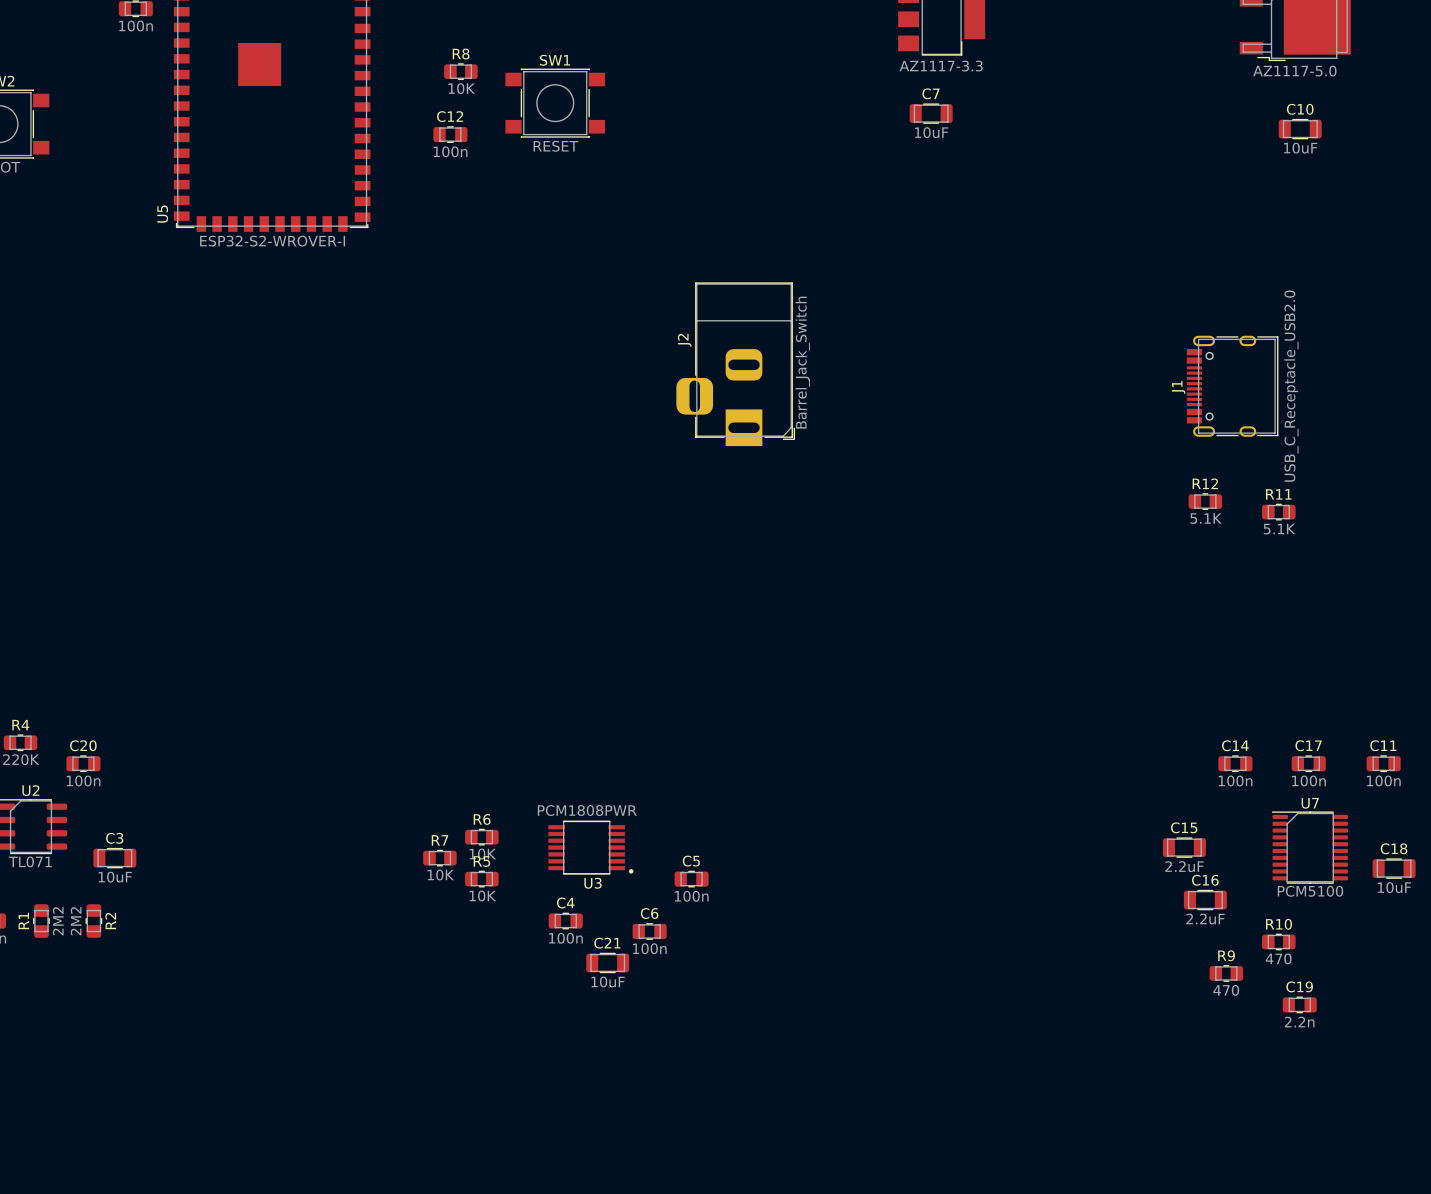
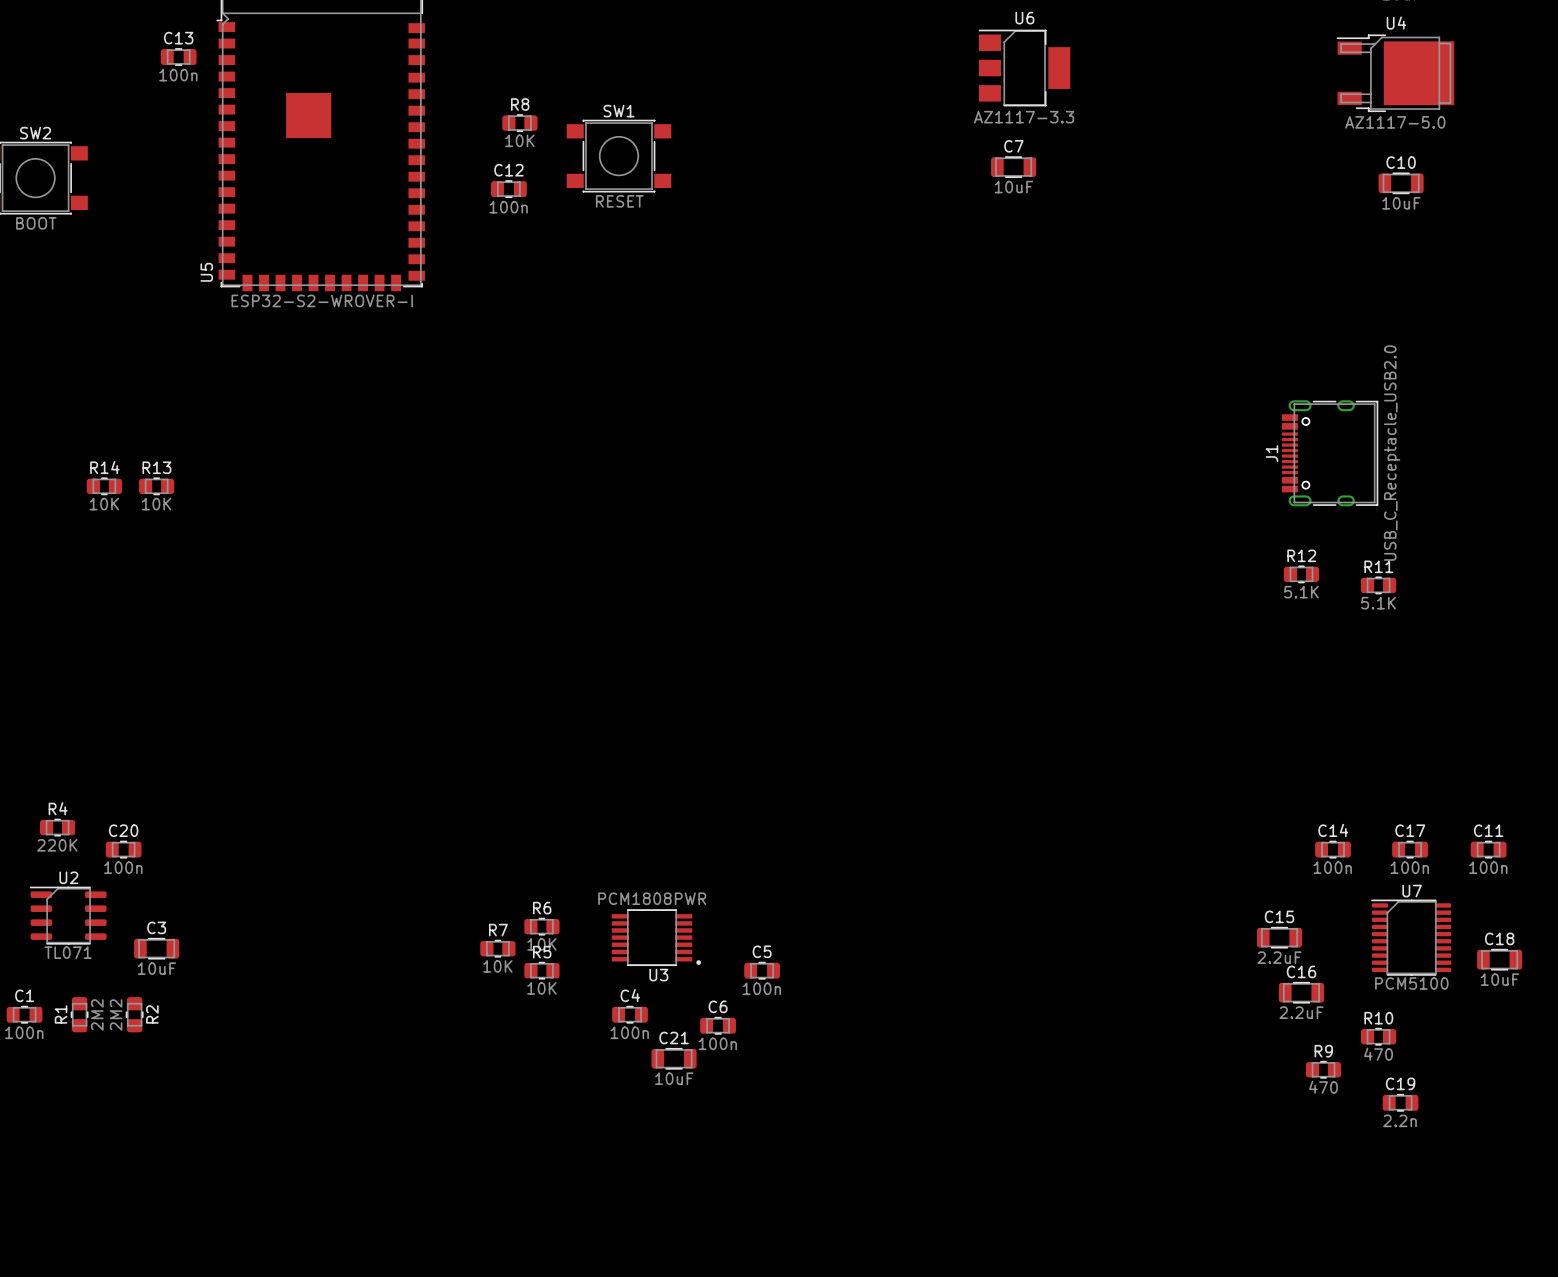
J2: Barrel_Jack_Switch (735, 364) -> none
R14: none -> 10K (104, 486)
R13: none -> 10K (156, 486)

